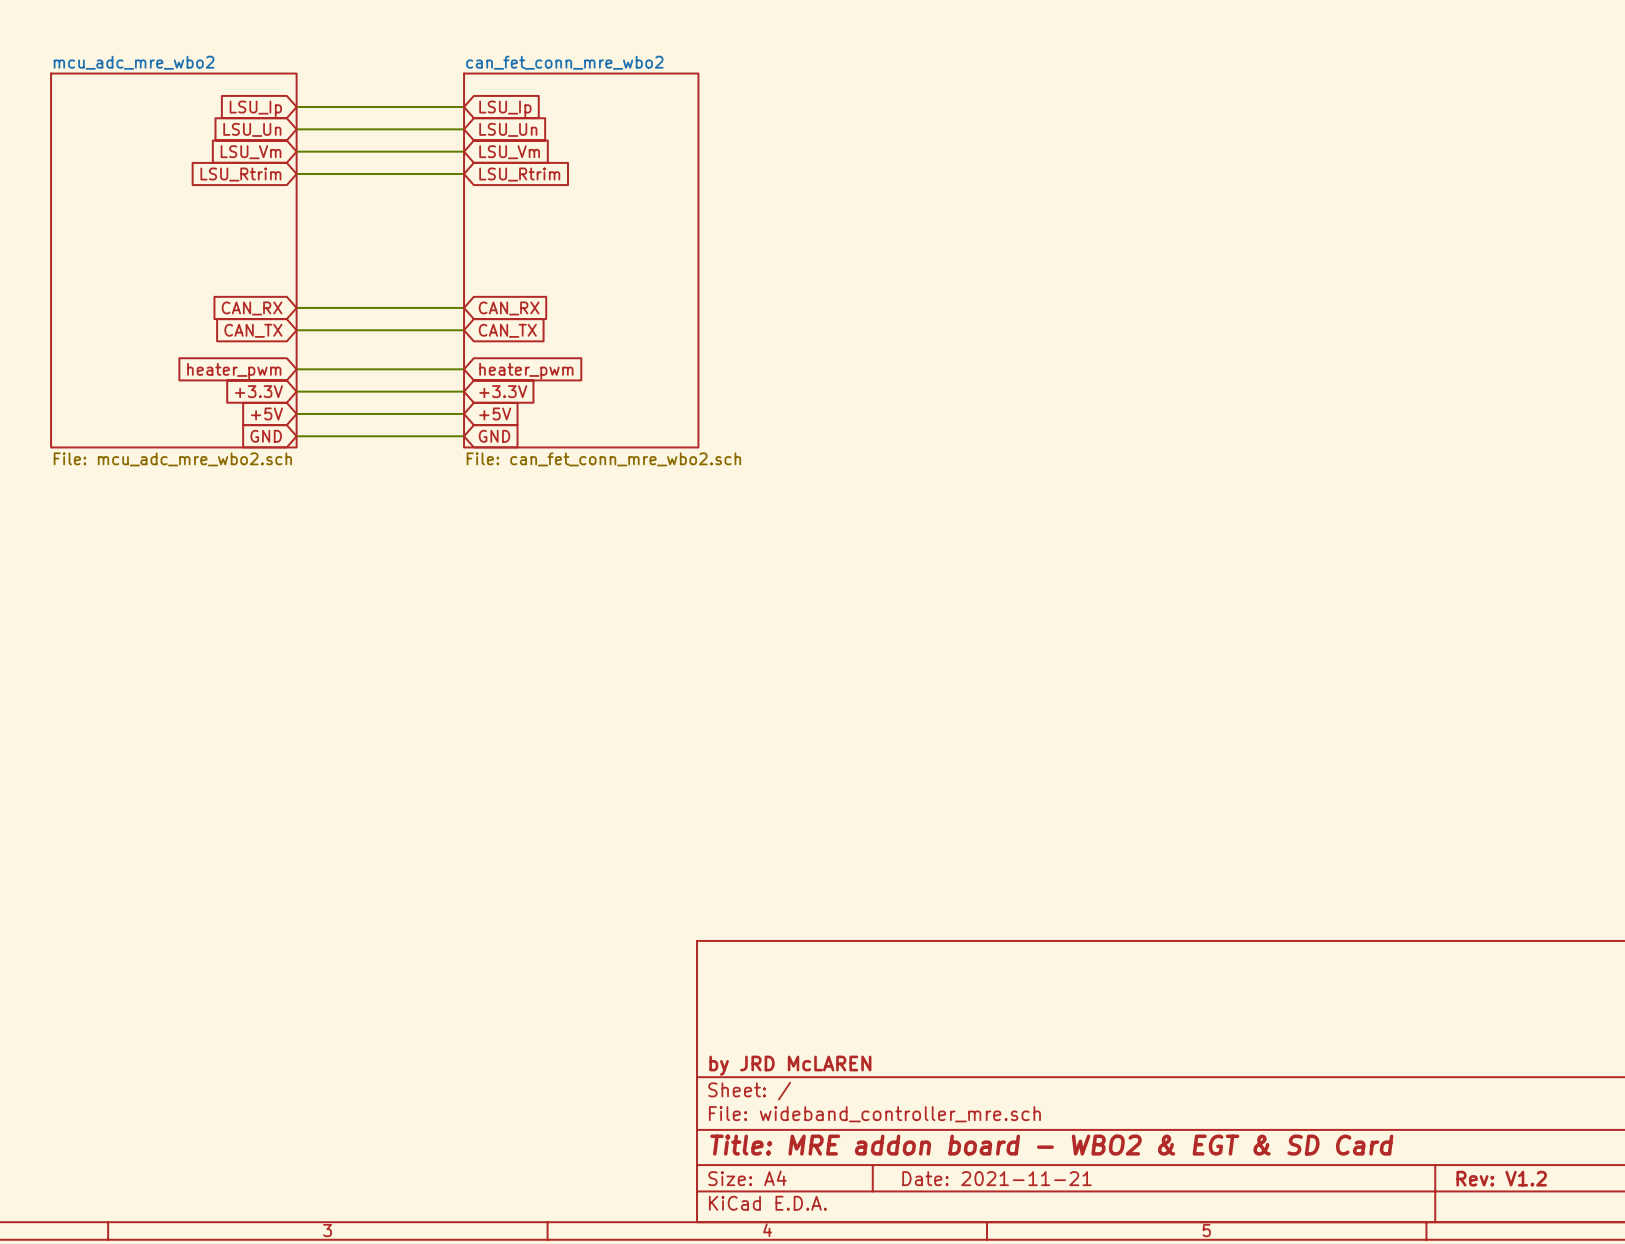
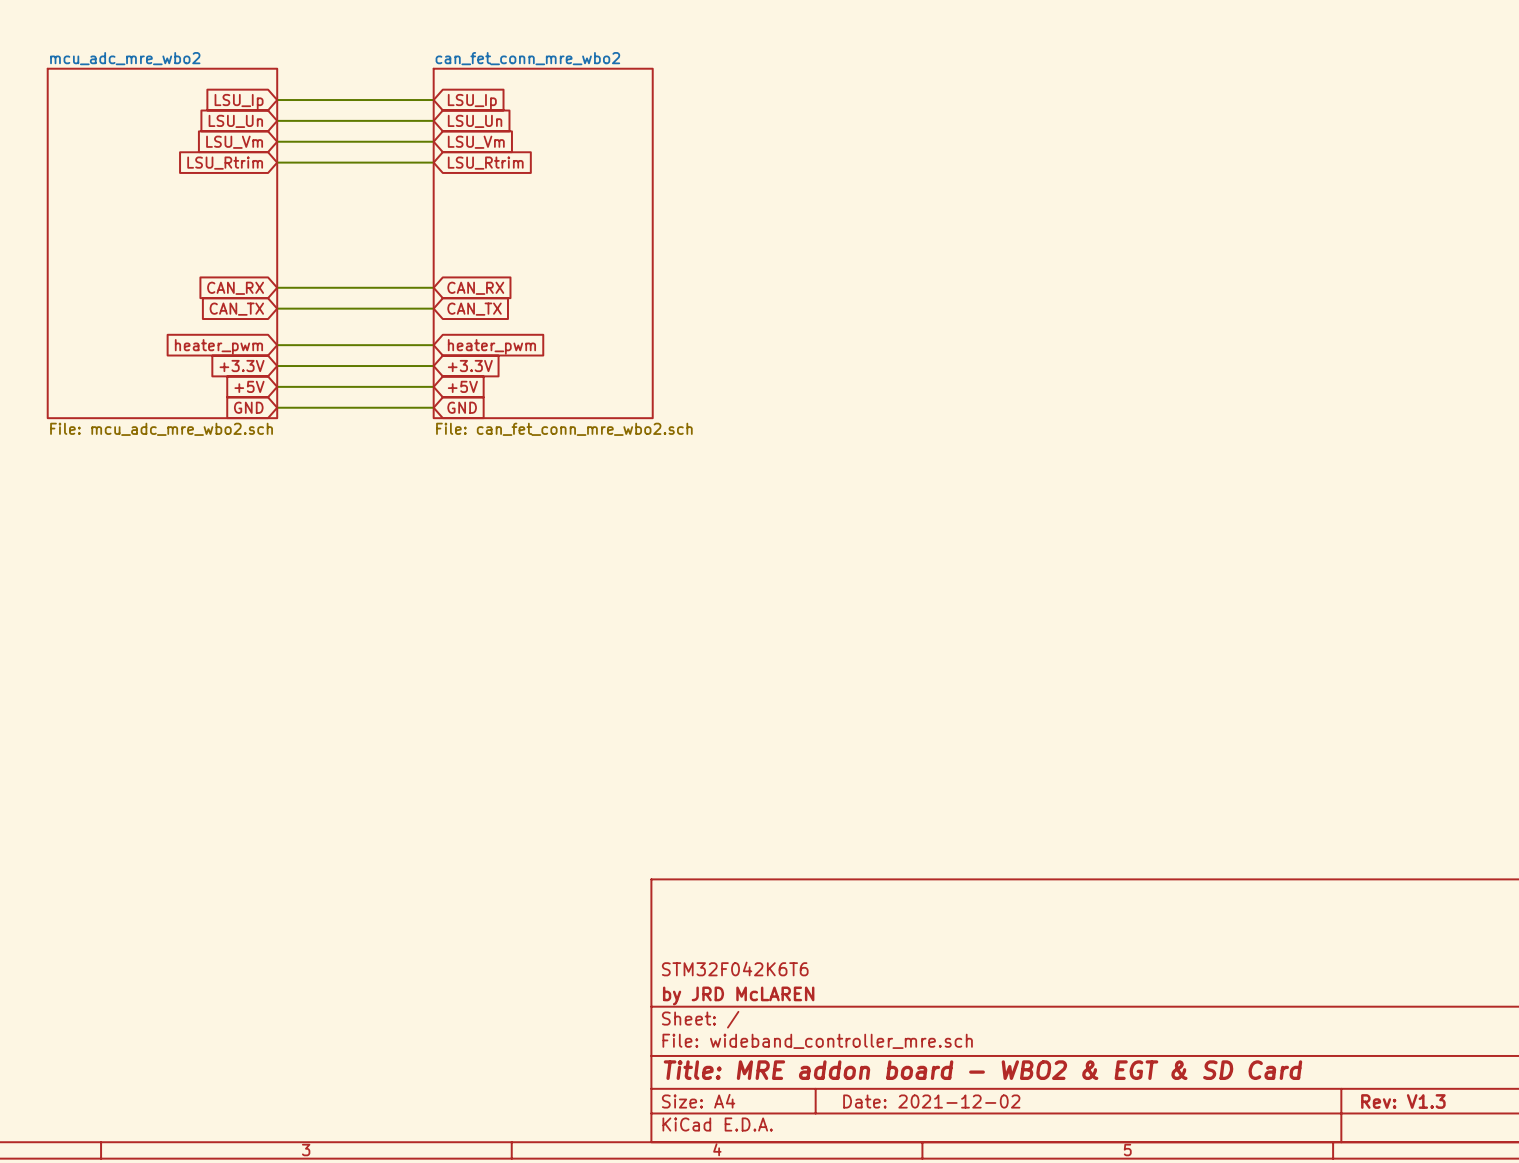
title block: none -> STM32F042K6T6 (735, 968)
title block: Date: 2021-11-21 (997, 1178) -> Date: 2021-12-02 (931, 1101)
title block: Rev: V1.2 (1501, 1178) -> Rev: V1.3 (1403, 1101)

